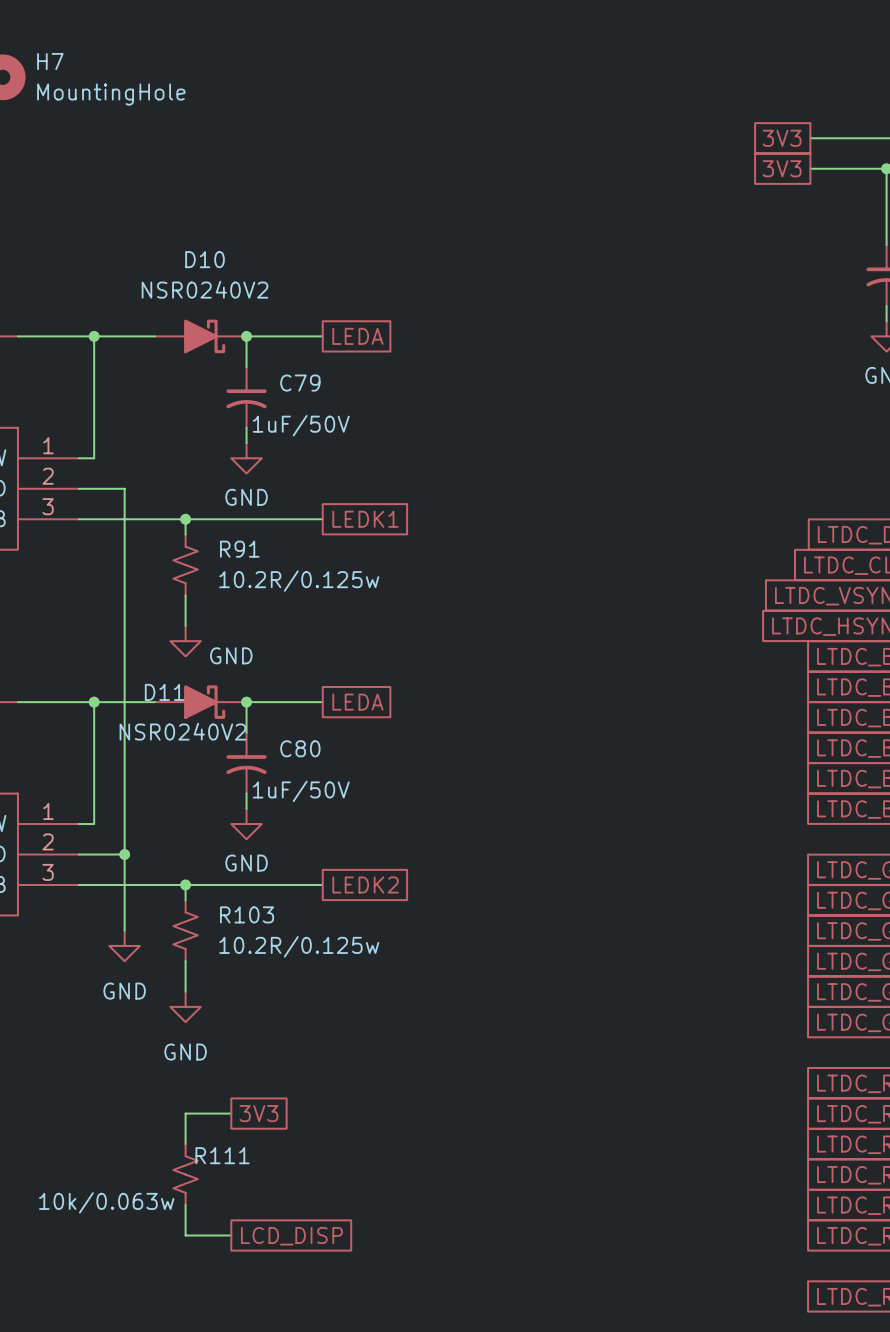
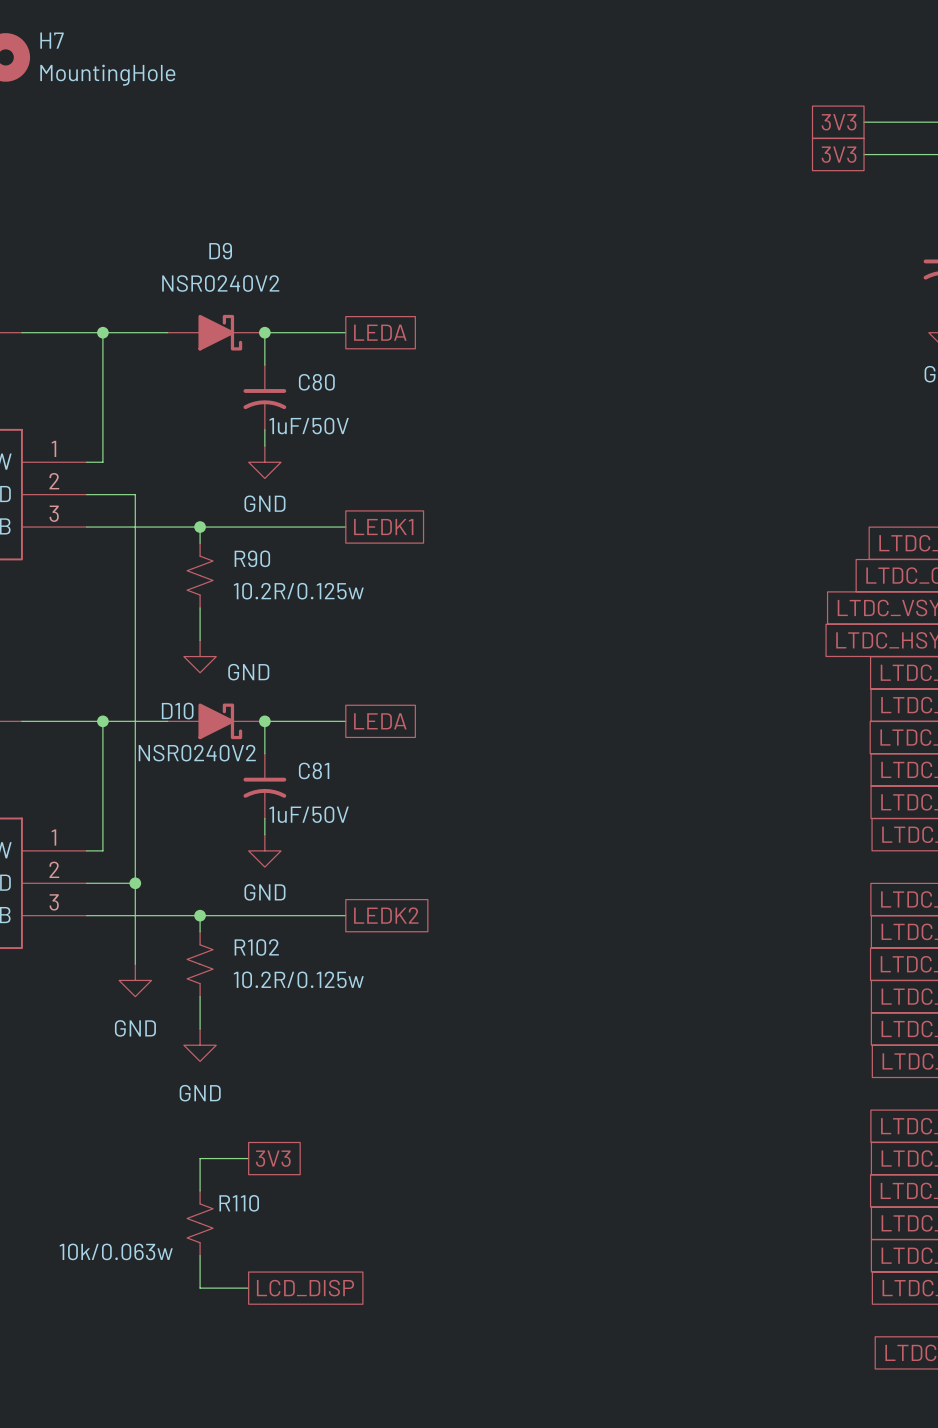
D10 name: D10 (205, 259) -> D9 (220, 251)
C79 name: C79 (300, 383) -> C80 (316, 382)
R91 name: R91 (239, 549) -> R90 (252, 558)
D11 name: D11 (164, 692) -> D10 (177, 711)
C80 name: C80 (300, 748) -> C81 (314, 770)
R103 name: R103 (247, 914) -> R102 (256, 947)
R111 name: R111 (222, 1155) -> R110 (239, 1203)

